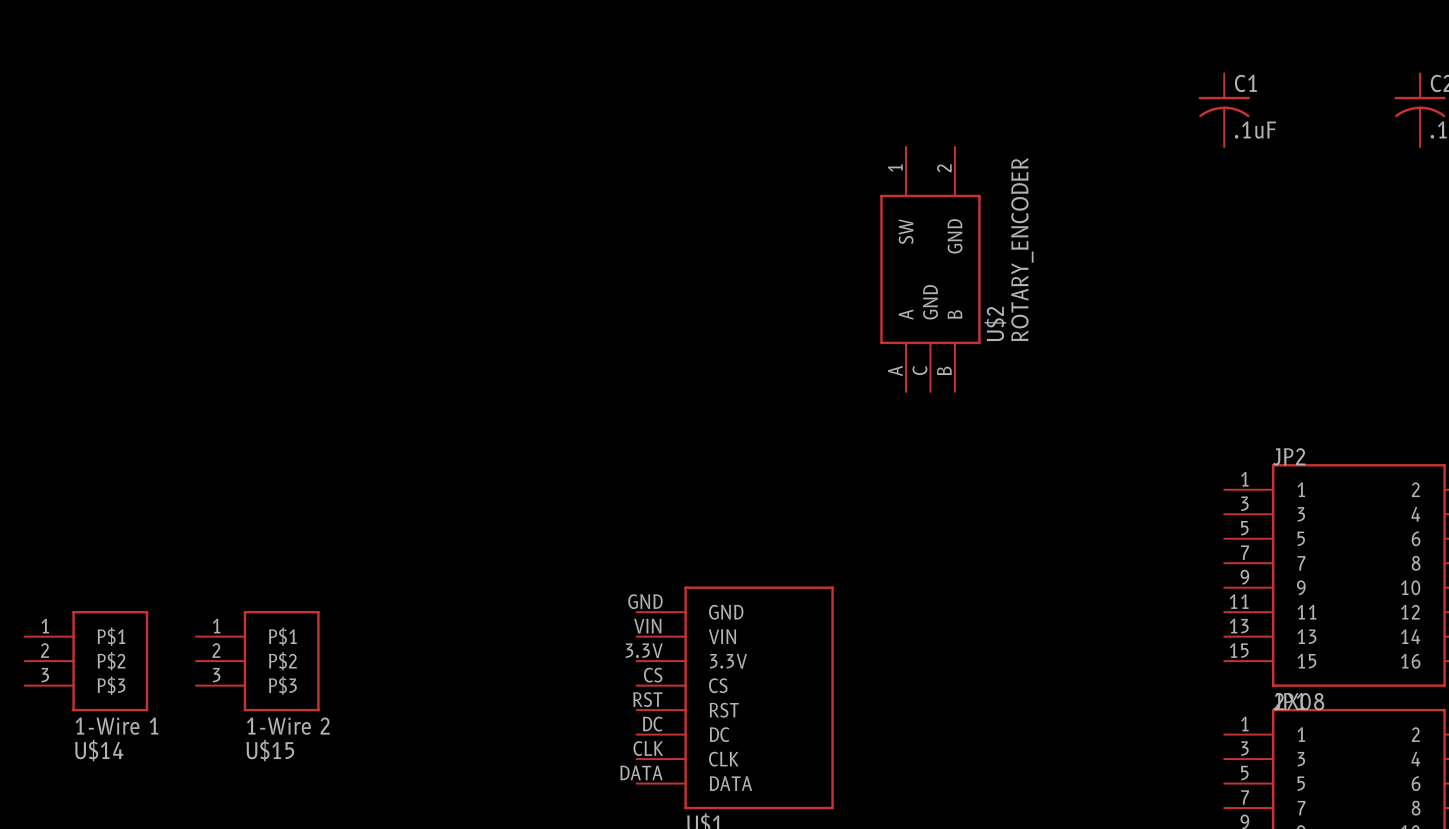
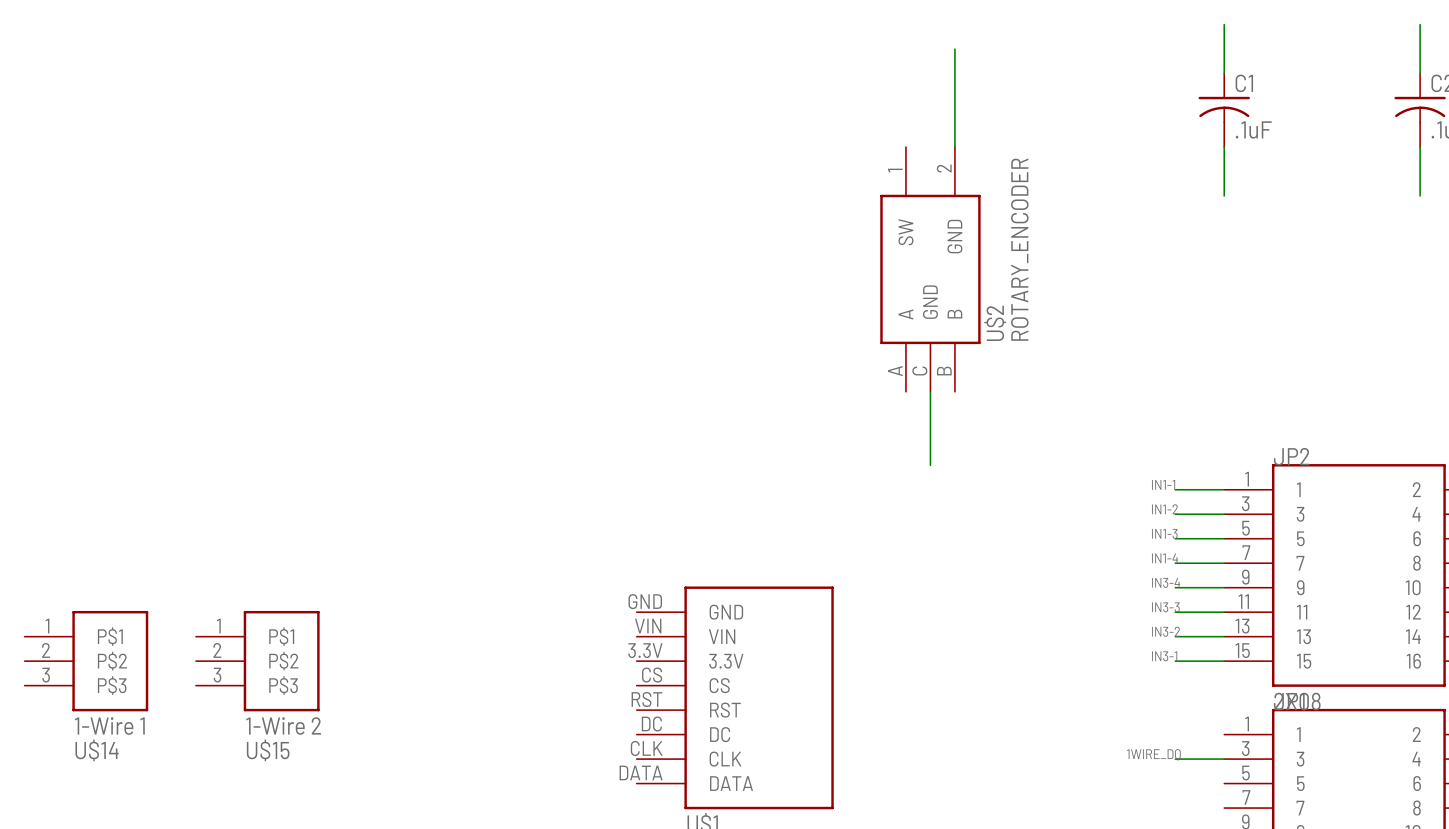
wire: none -> (1224, 24) (1224, 73)
wire: none -> (1420, 24) (1420, 73)
wire: none -> (954, 49) (954, 147)
wire: none -> (1224, 147) (1224, 195)
wire: none -> (1420, 147) (1420, 195)
wire: none -> (930, 391) (930, 465)
label: none -> IN1-1 (1163, 484)
wire: none -> (1175, 489) (1224, 489)
label: none -> IN1-2 (1164, 509)
wire: none -> (1175, 514) (1224, 514)
label: none -> IN1-3 (1164, 533)
wire: none -> (1175, 538) (1224, 538)
label: none -> IN1-4 (1165, 558)
wire: none -> (1175, 563) (1224, 563)
label: none -> IN3-4 (1166, 582)
wire: none -> (1175, 587) (1224, 587)
label: none -> IN3-3 (1165, 607)
wire: none -> (1175, 612) (1224, 612)
label: none -> IN3-2 (1165, 631)
wire: none -> (1175, 636) (1224, 636)
label: none -> IN3-1 (1164, 656)
wire: none -> (1175, 661) (1224, 661)
label: none -> 1WIRE_DQ (1153, 754)
wire: none -> (1175, 759) (1224, 759)

